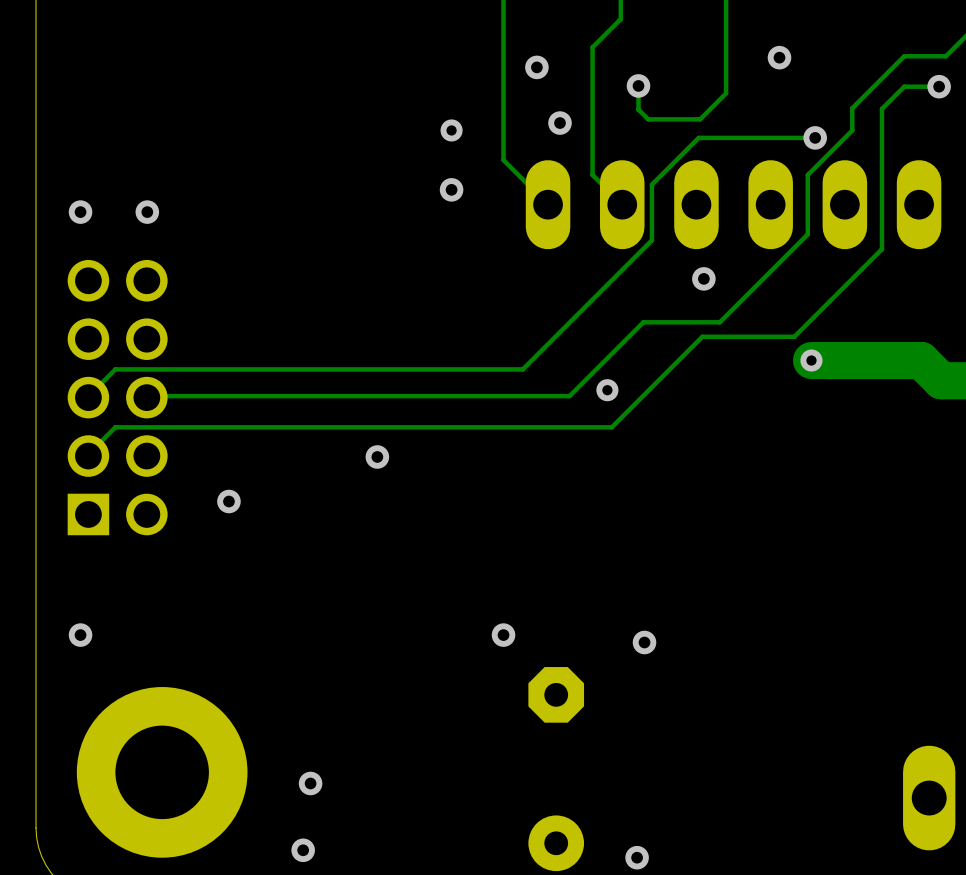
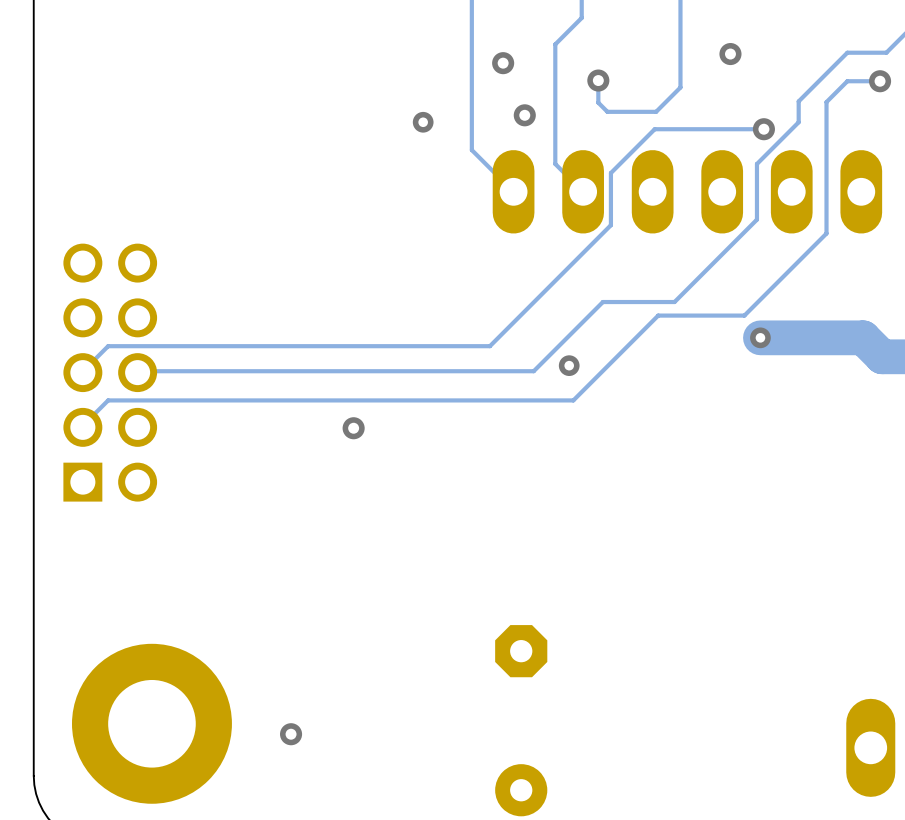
via: (451, 189) -> none
via: (80, 212) -> none
via: (147, 212) -> none
via: (703, 278) -> none
via: (228, 501) -> none
via: (80, 635) -> none
via: (503, 635) -> none
via: (644, 642) -> none
via: (303, 850) -> none
via: (637, 857) -> none

